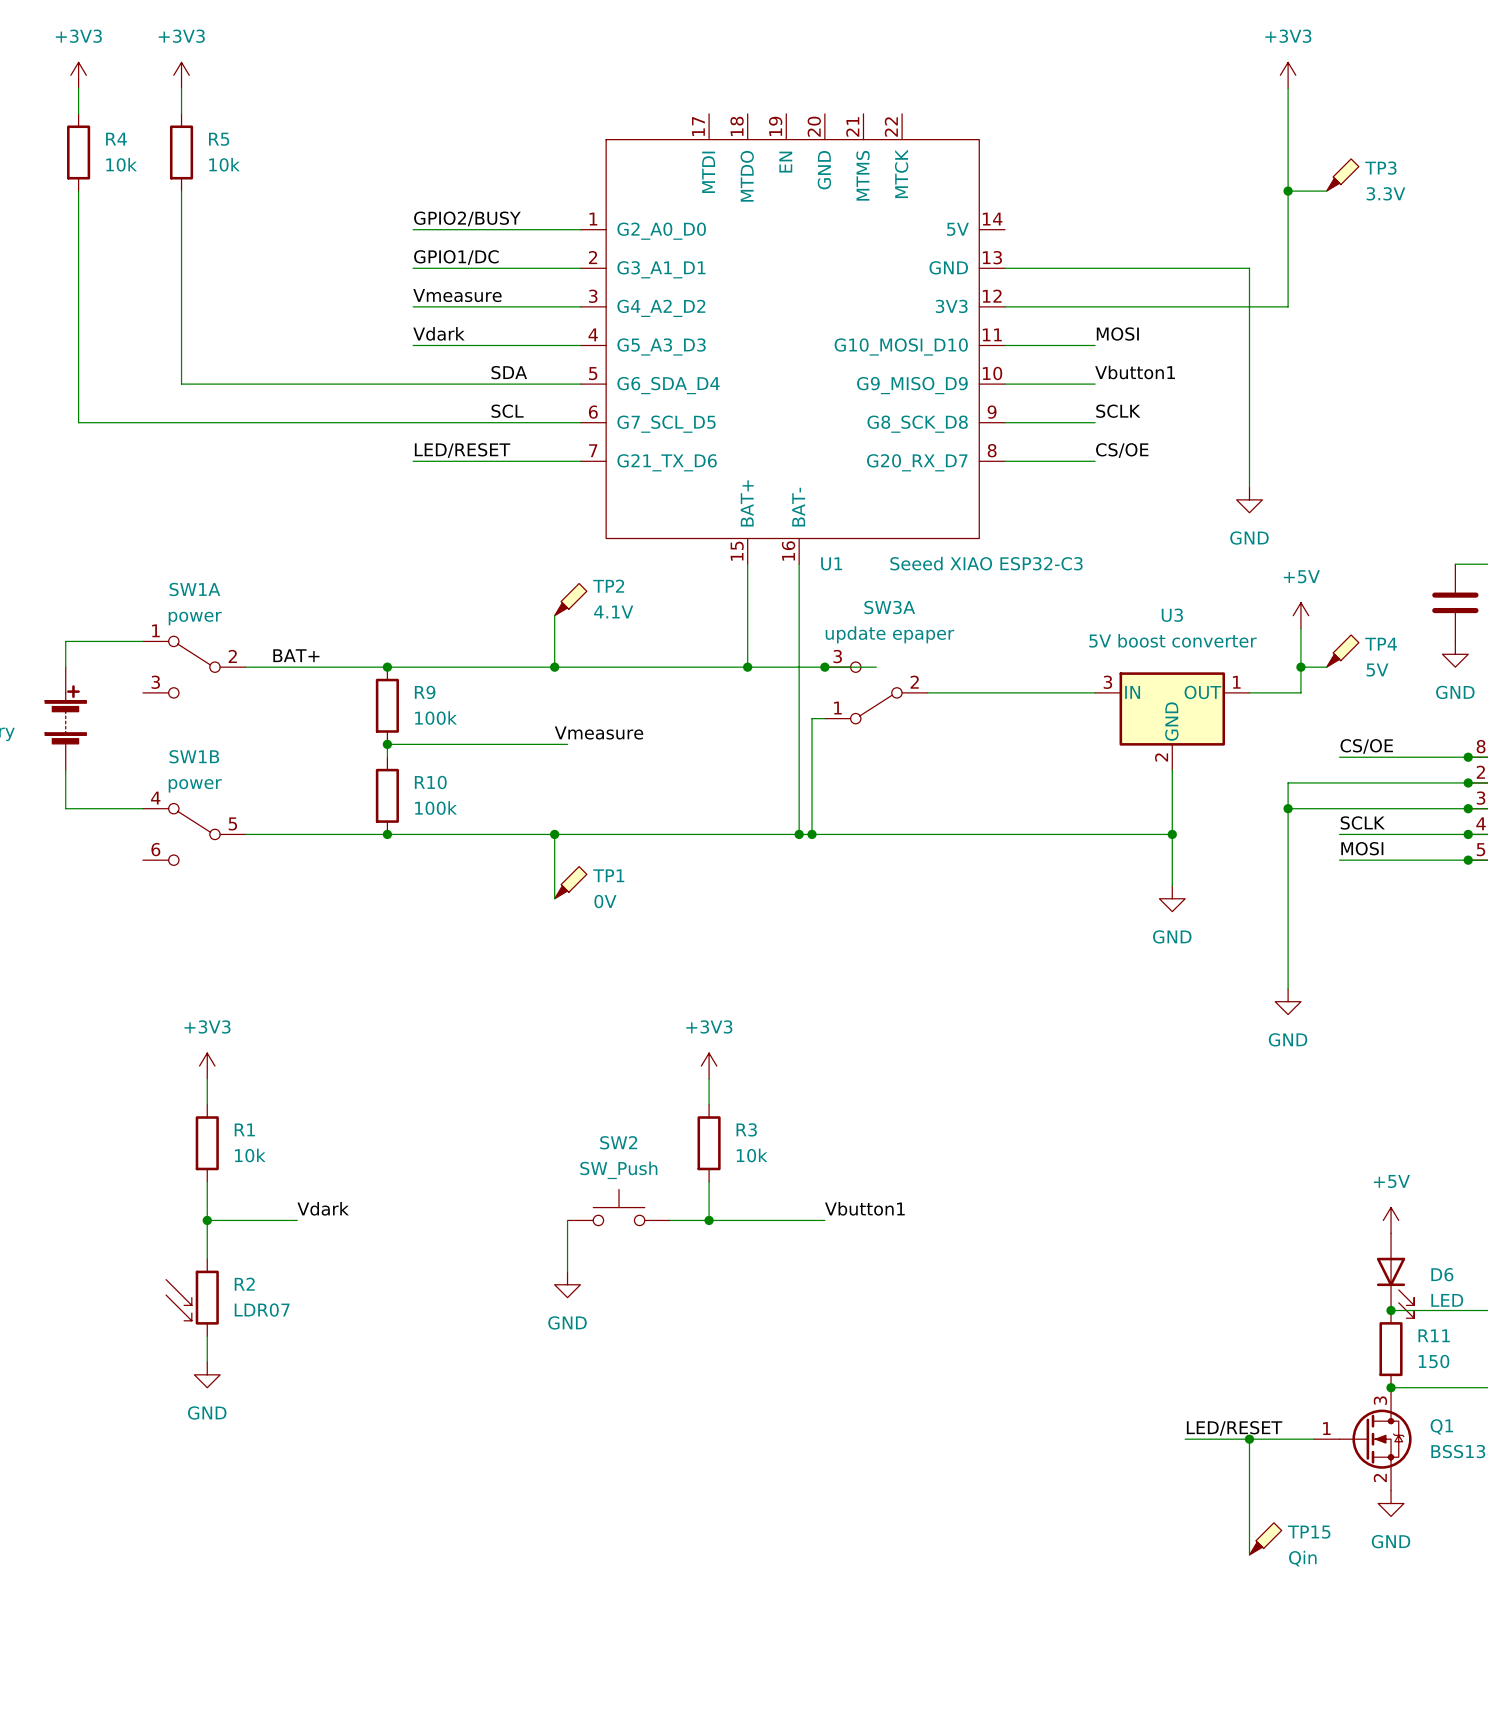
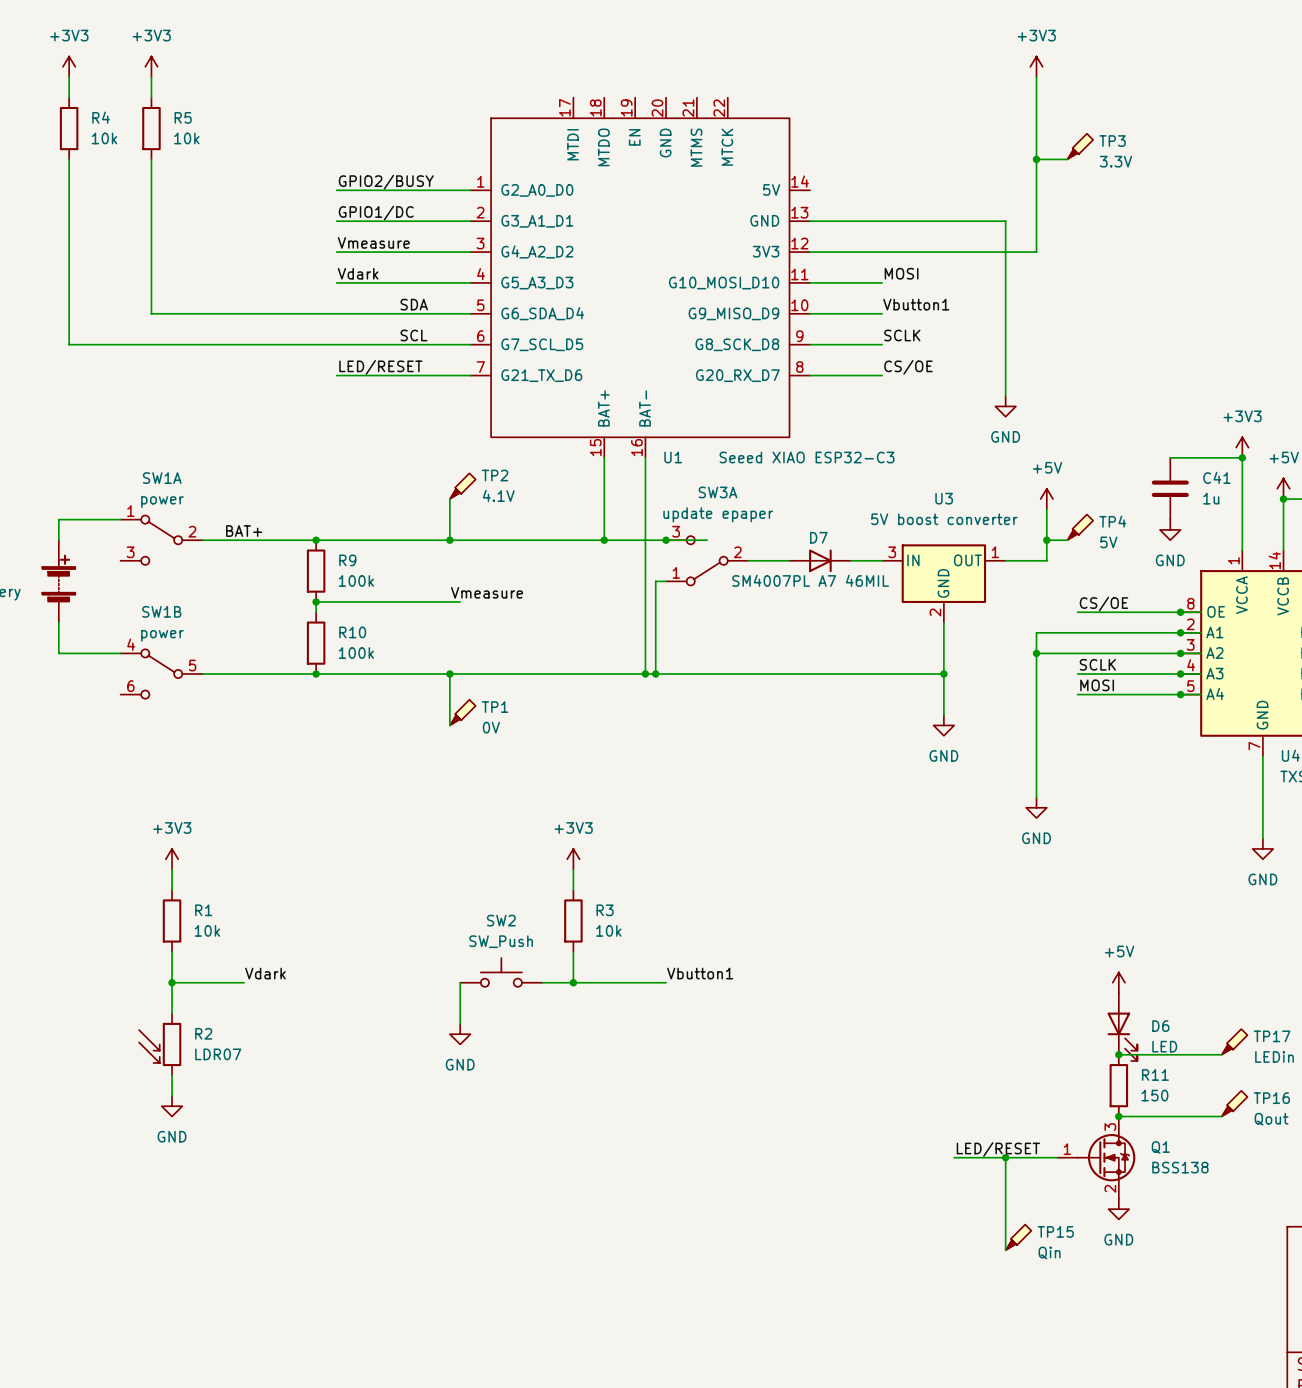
D7: none -> SM4007PL A7 46MIL (820, 560)

